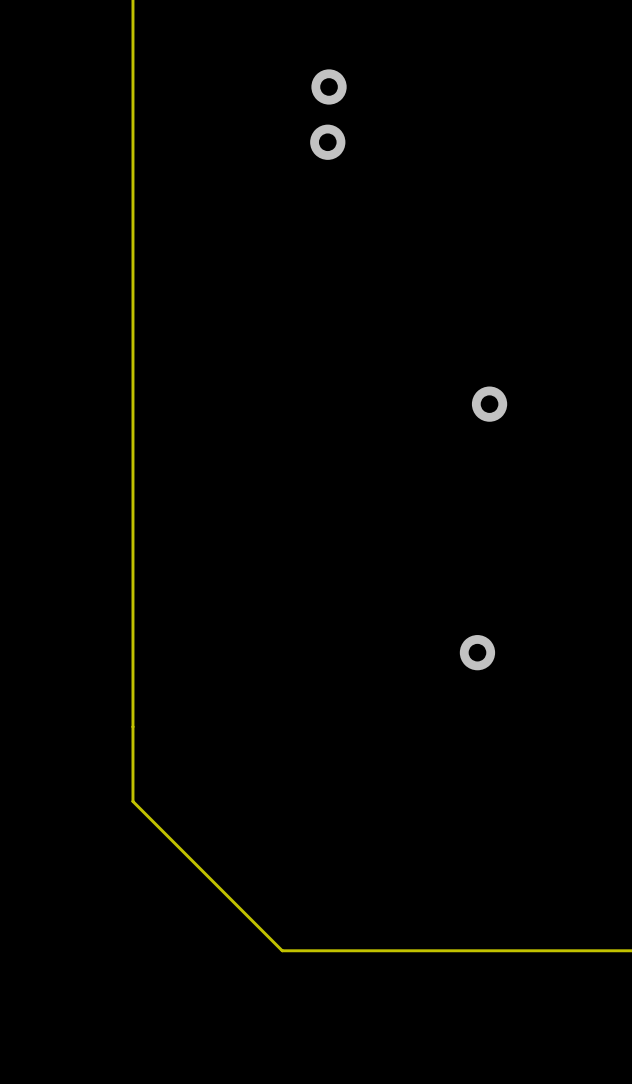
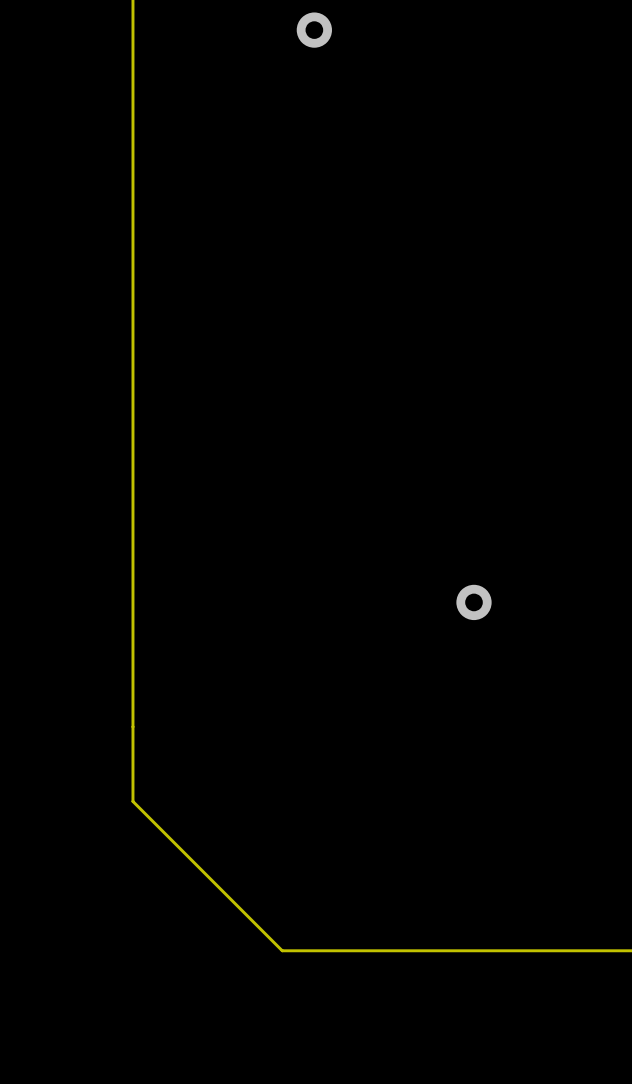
via: none -> (314, 30)
via: (329, 86) -> none
via: (327, 142) -> none
via: (489, 404) -> none
via position: (477, 652) -> (473, 602)

